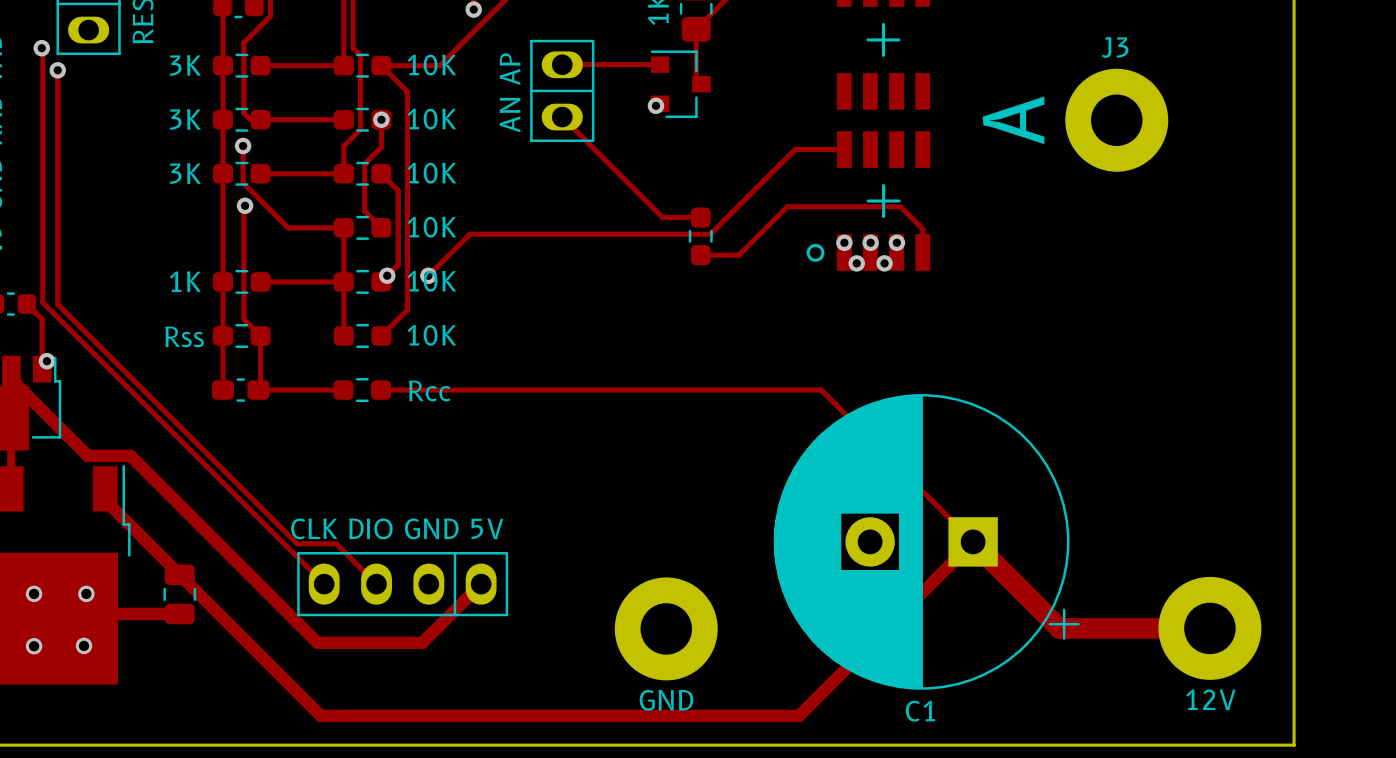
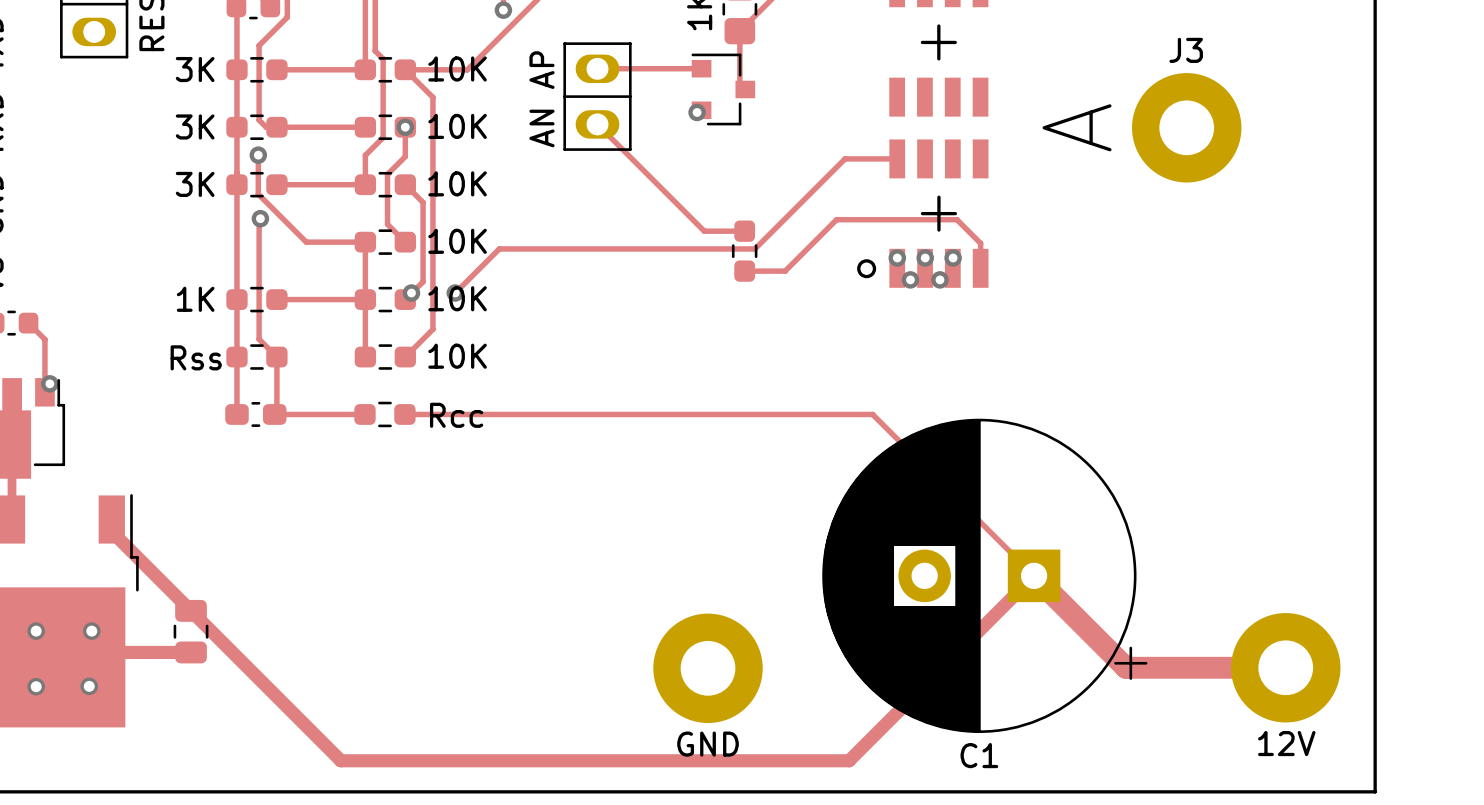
track: (41, 48) (42, 302) (324, 583) -> none
via: (41, 48) -> none
track: (57, 70) (57, 304) (297, 543) (336, 543) (376, 584) -> none
via: (57, 70) -> none
track: (11, 370) (11, 379) (87, 455) (130, 455) (317, 642) (422, 642) (481, 584) -> none
part: CLK DIO GND 5V (402, 584) -> none

